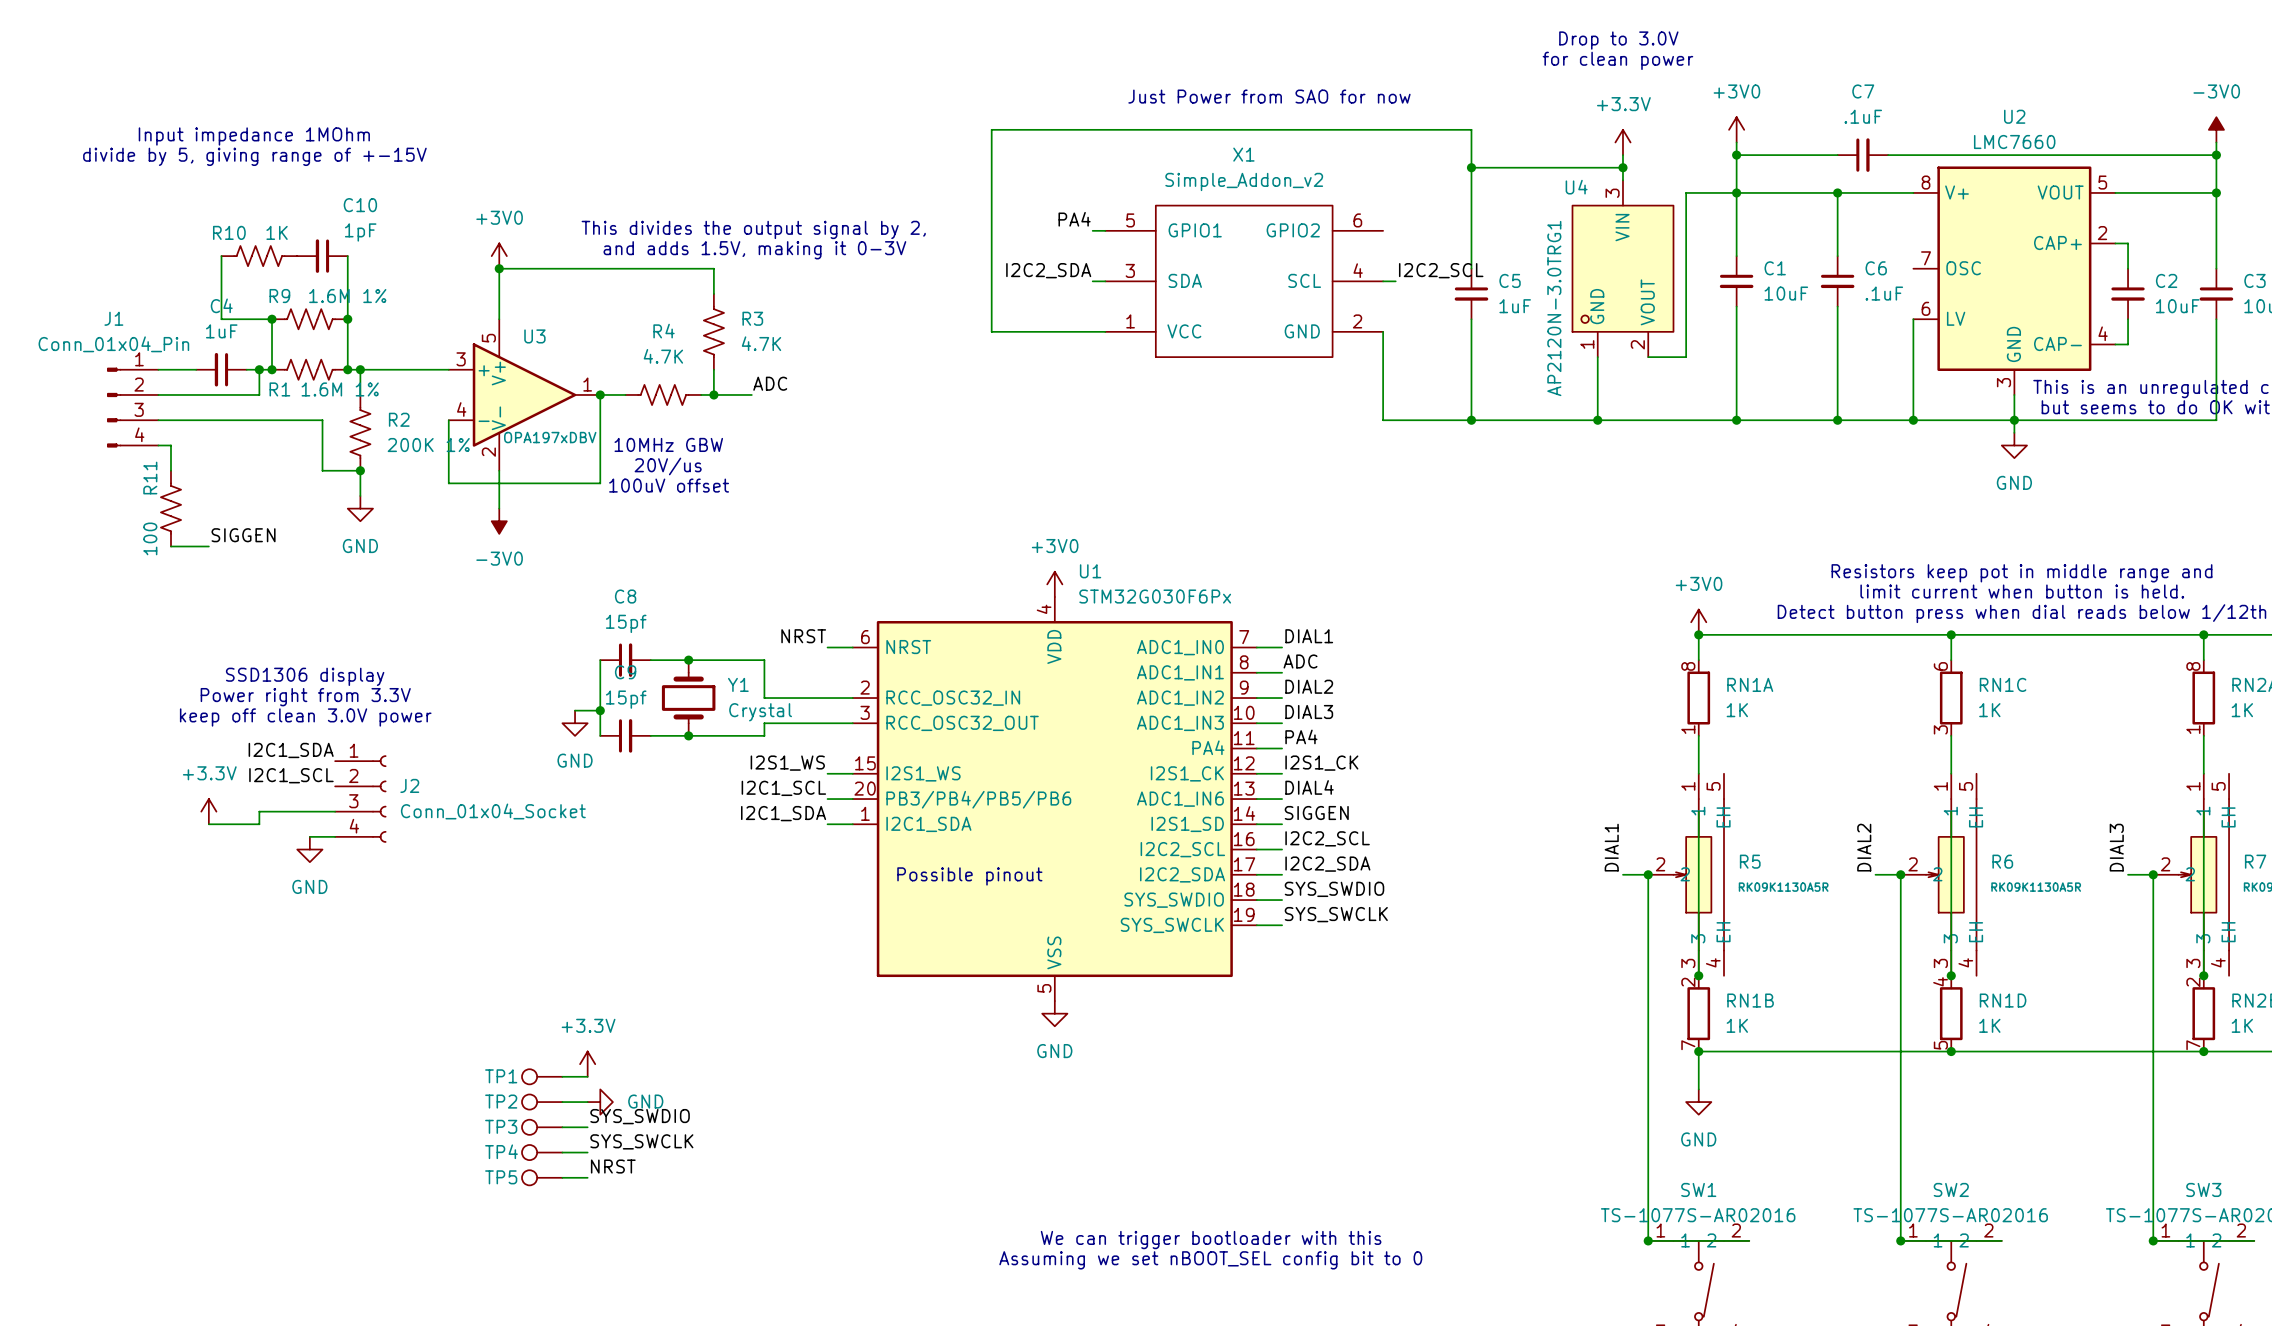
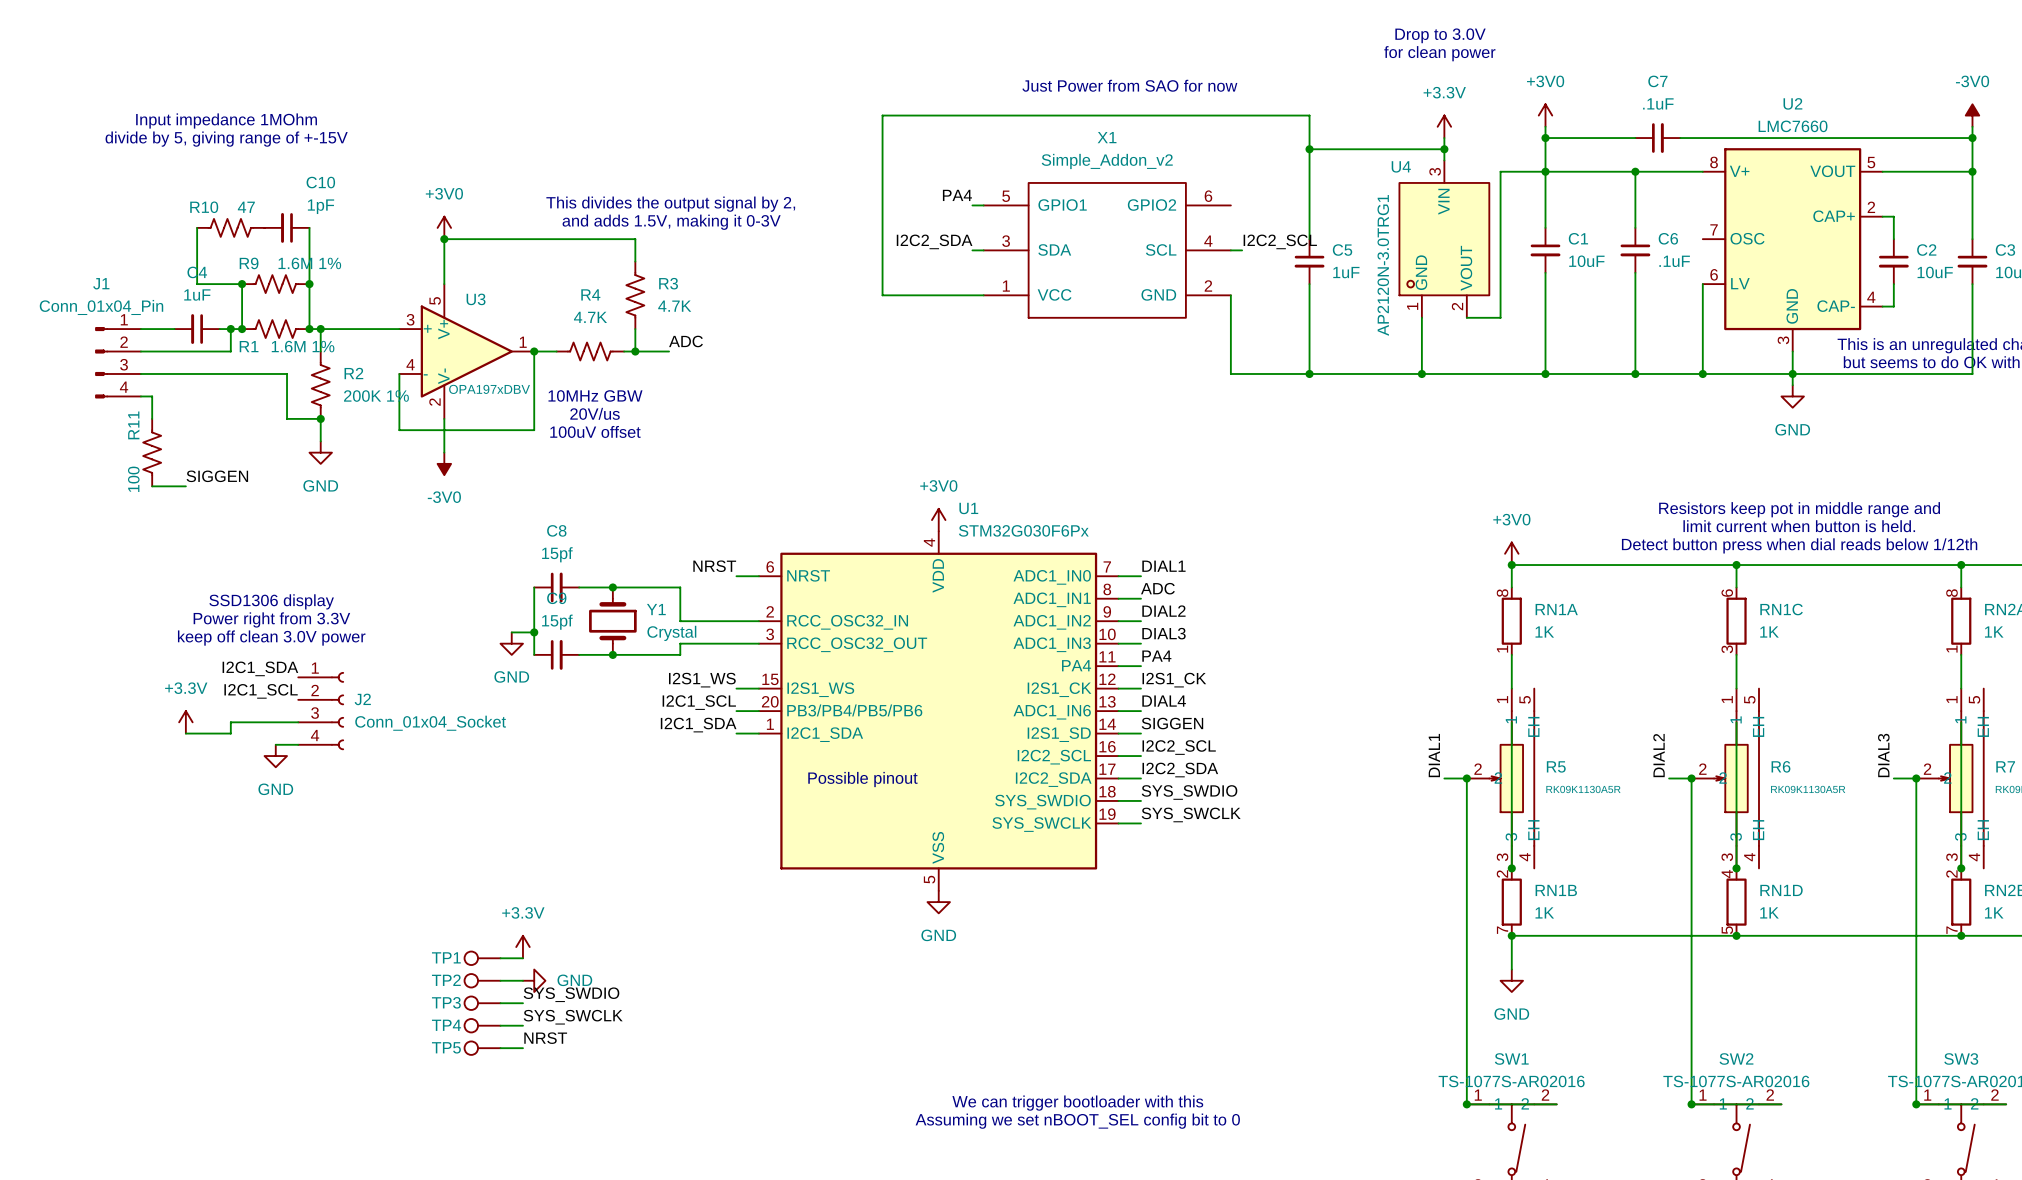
R10 value: 1K (277, 232) -> 47 (246, 207)

